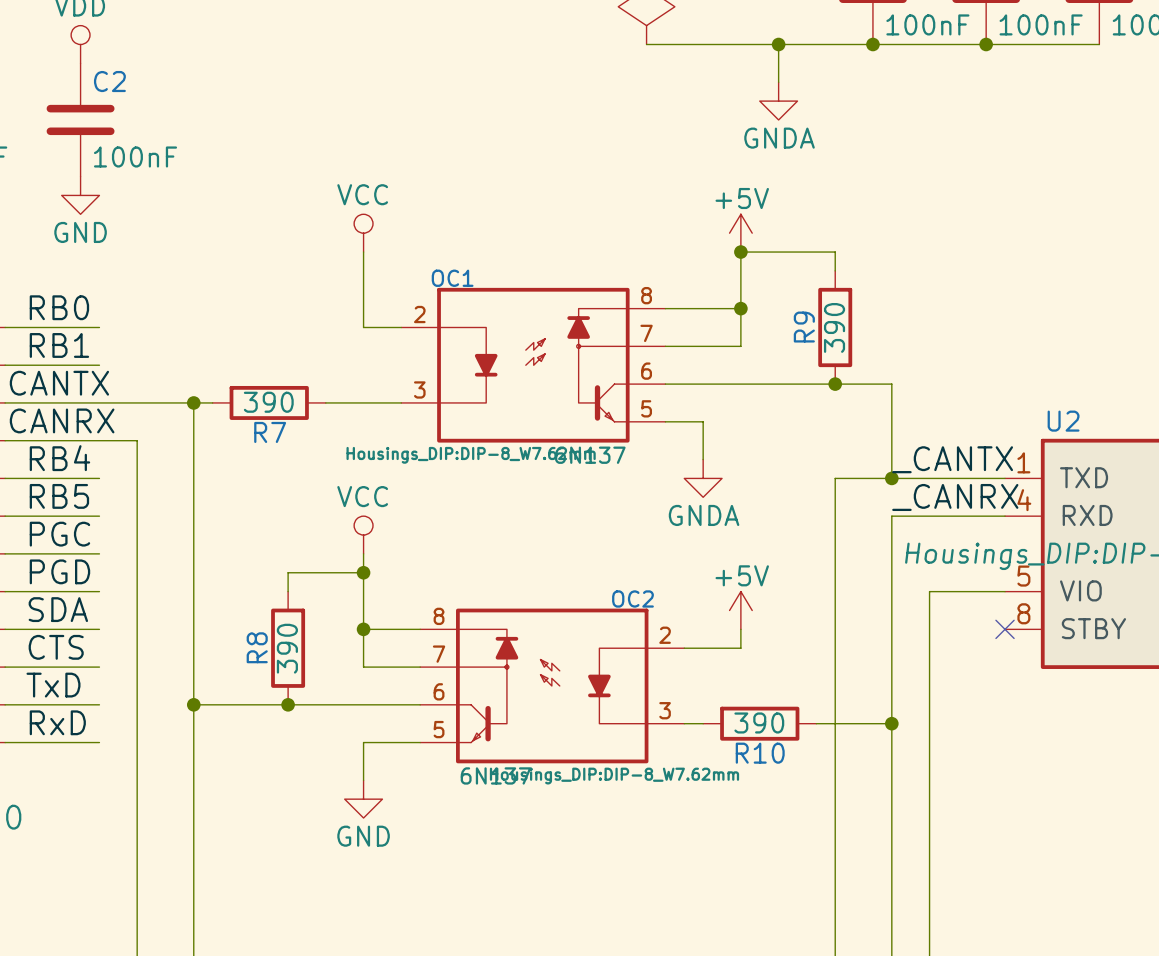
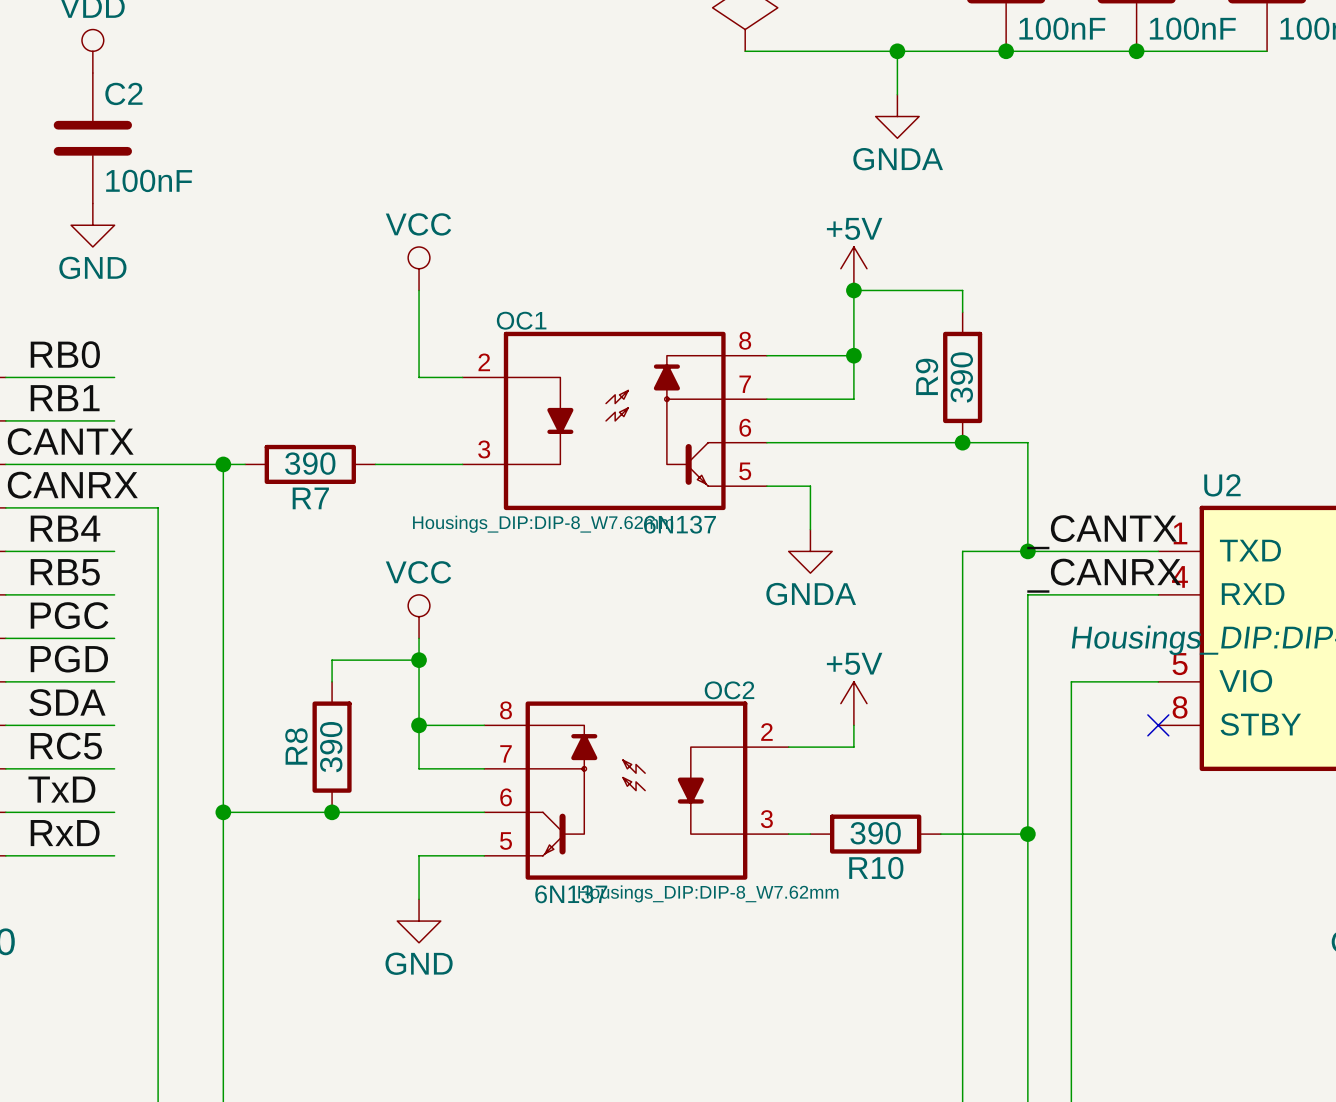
label: CTS (56, 647) -> RC5 (66, 746)

